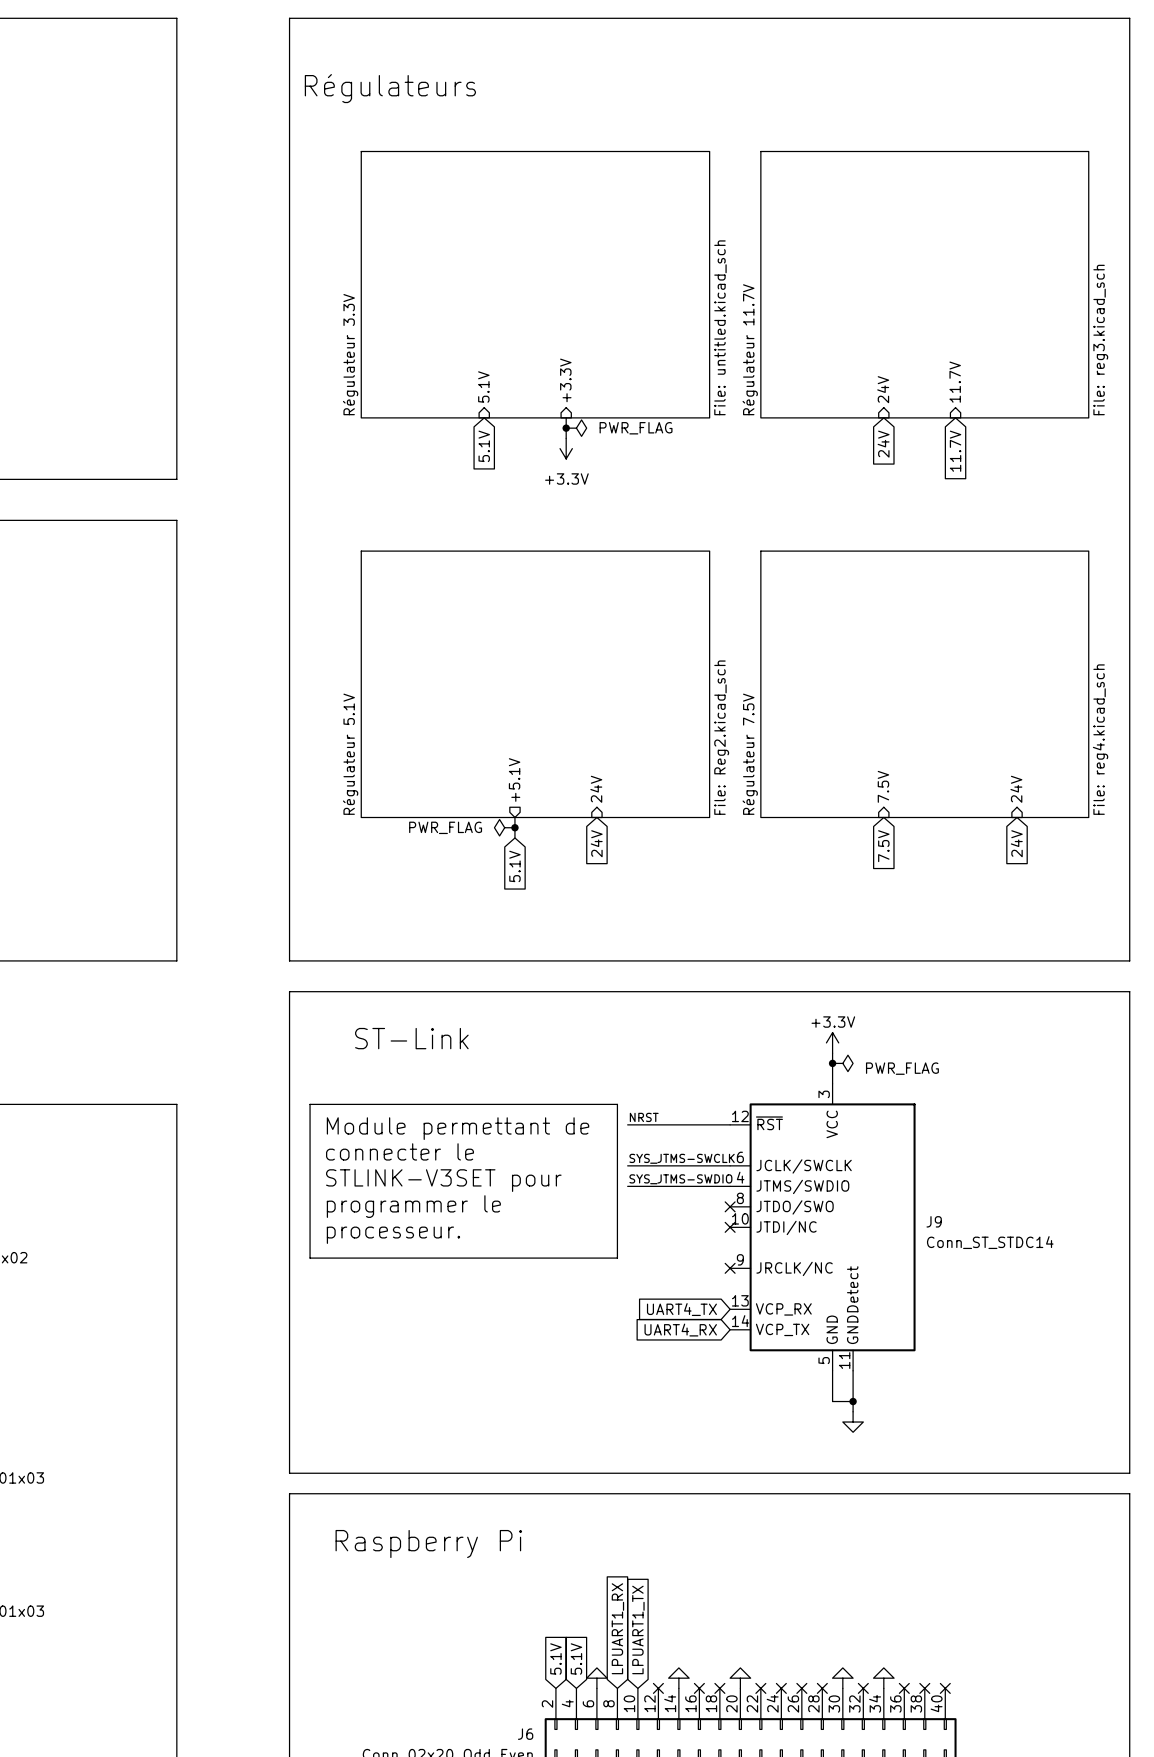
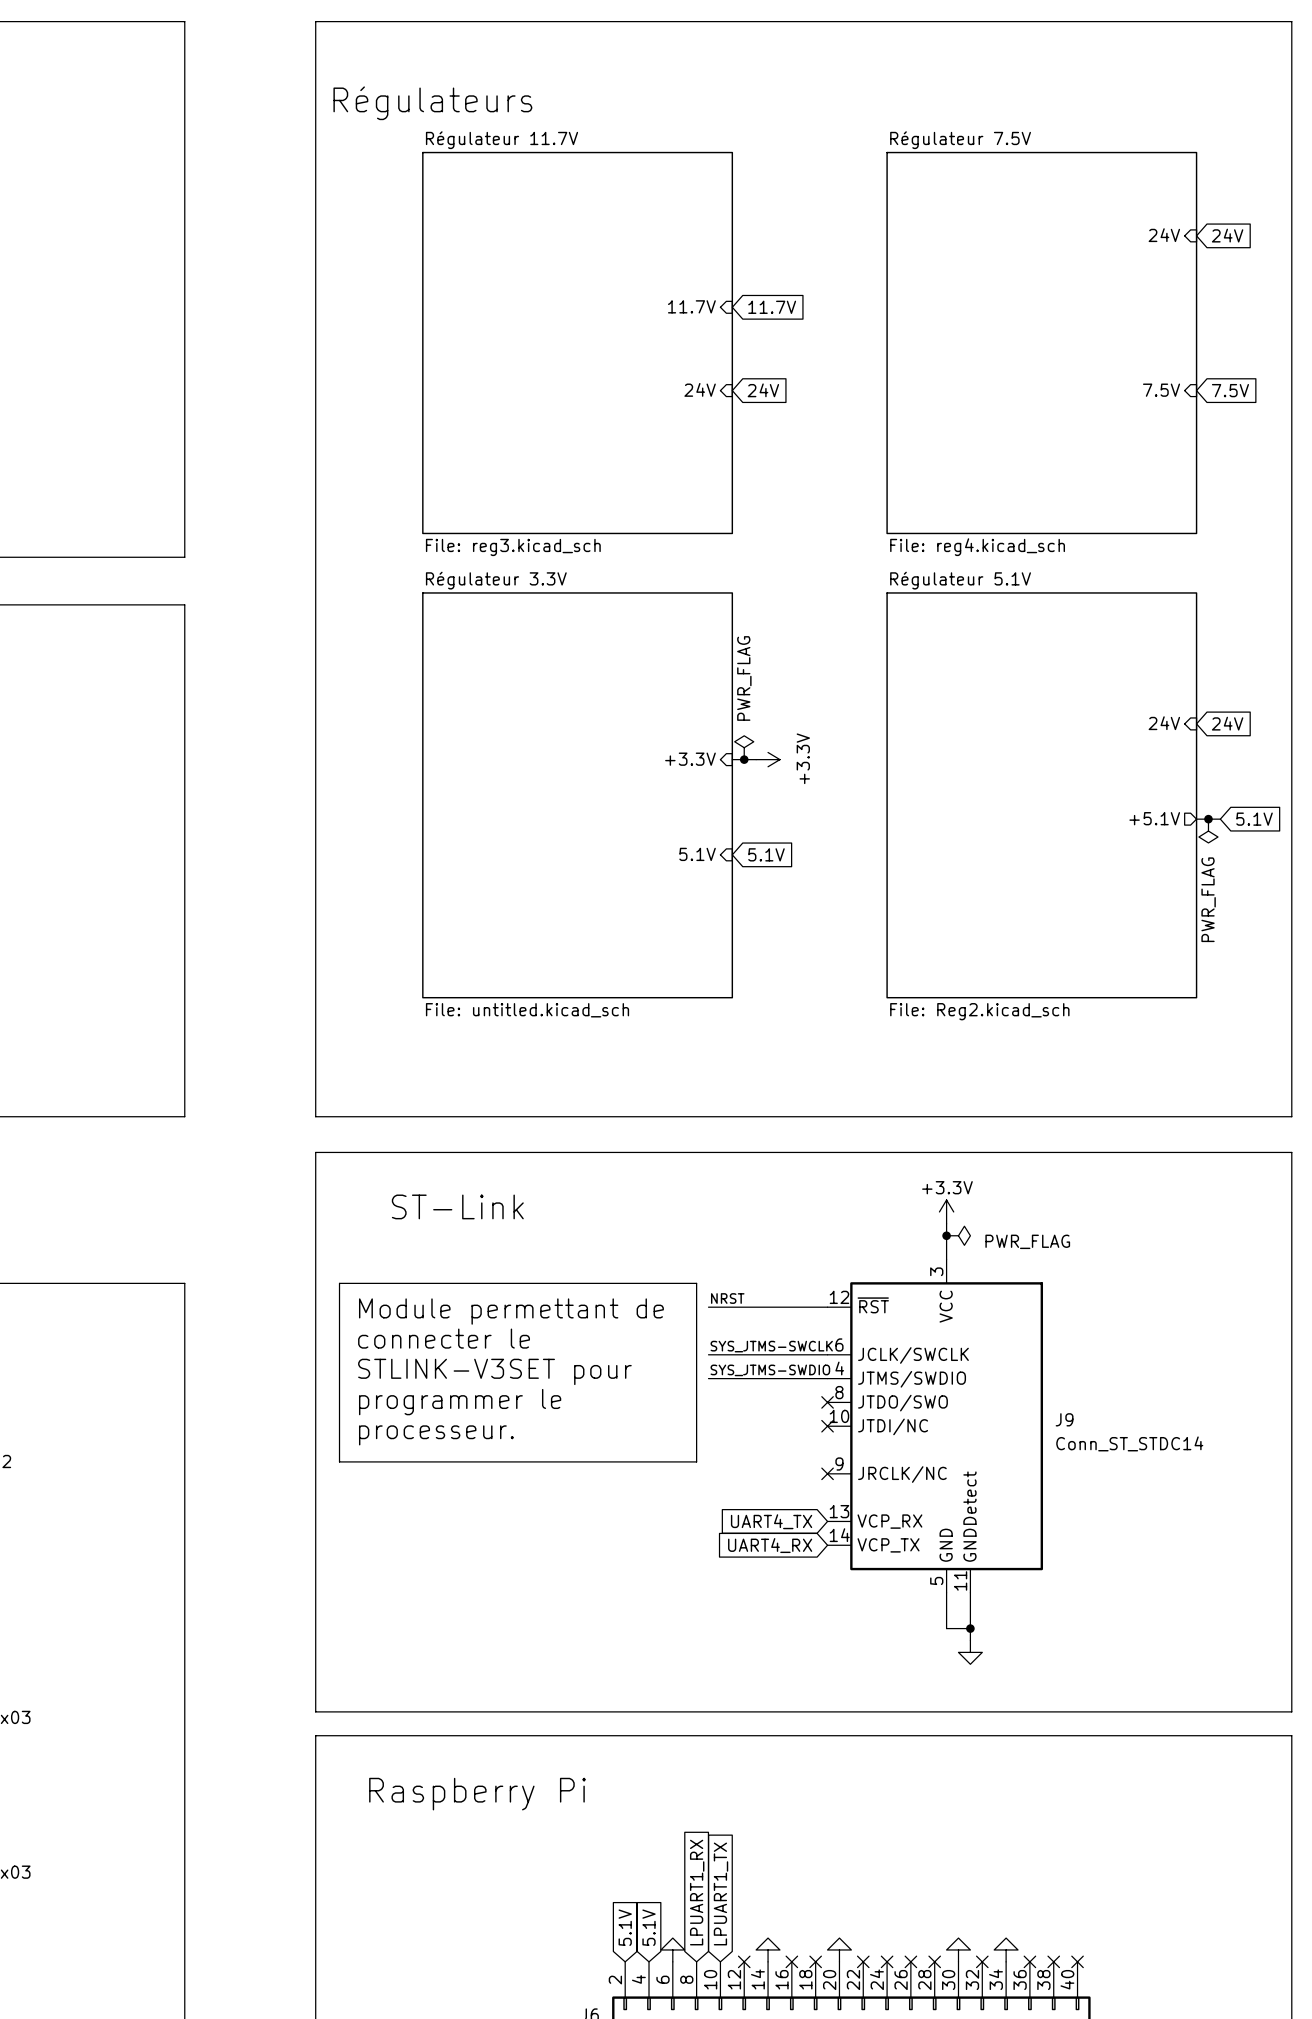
sheet pin: none -> 24V (1164, 235)
global label: none -> 24V (1227, 235)
sheet pin: none -> 11.7V (691, 306)
global label: none -> 11.7V (772, 307)
sheet Régulateur 3.3V rotation: 0° (535, 284) -> 90° clockwise (577, 795)
sheet Régulateur 3.3V position: (535, 284) -> (577, 795)
sheet Régulateur 11.7V rotation: 0° (924, 284) -> 90° clockwise (577, 343)
sheet Régulateur 11.7V position: (924, 284) -> (577, 343)
sheet pin: none -> 24V (700, 389)
global label: none -> 24V (763, 390)
sheet pin: none -> 7.5V (1161, 390)
global label: none -> 7.5V (1230, 390)
sheet pin: +3.3V (565, 380) -> none
sheet pin: 11.7V (955, 382) -> none
sheet pin: 5.1V (483, 387) -> none
sheet pin: 24V (883, 389) -> none
wire: (566, 417) (566, 438) -> none
junction: (566, 428) -> none
power symbol: PWR_FLAG (576, 428) -> none
global label: 24V (883, 444) -> none
global label: 5.1V (484, 446) -> none
power symbol: +3.3V (566, 448) -> none
global label: 11.7V (955, 451) -> none
sheet pin: none -> 24V (1164, 723)
global label: none -> 24V (1227, 723)
power symbol: none -> PWR_FLAG (744, 747)
sheet pin: none -> +3.3V (690, 759)
wire: none -> (732, 759) (756, 759)
junction: none -> (744, 759)
power symbol: none -> +3.3V (768, 759)
sheet Régulateur 5.1V rotation: 0° (535, 684) -> 90° clockwise (1041, 795)
sheet Régulateur 5.1V position: (535, 684) -> (1041, 795)
sheet Régulateur 7.5V rotation: 0° (924, 684) -> 90° clockwise (1041, 343)
sheet Régulateur 7.5V position: (924, 684) -> (1041, 343)
sheet pin: none -> +5.1V (1154, 818)
wire: none -> (1196, 819) (1220, 819)
junction: none -> (1208, 819)
global label: none -> 5.1V (1254, 819)
power symbol: none -> PWR_FLAG (1208, 831)
sheet pin: none -> 5.1V (697, 854)
sheet pin: +5.1V (514, 780) -> none
sheet pin: 7.5V (883, 786) -> none
sheet pin: 24V (596, 789) -> none
sheet pin: 24V (1016, 789) -> none
wire: (514, 817) (514, 837) -> none
power symbol: PWR_FLAG (504, 827) -> none
junction: (514, 827) -> none
global label: 24V (596, 843) -> none
global label: 24V (1016, 843) -> none
global label: 7.5V (883, 846) -> none
global label rotation: 0° (514, 866) -> 90° counterclockwise (766, 854)
global label position: 5.1V (514, 866) -> 5.1V (766, 854)

